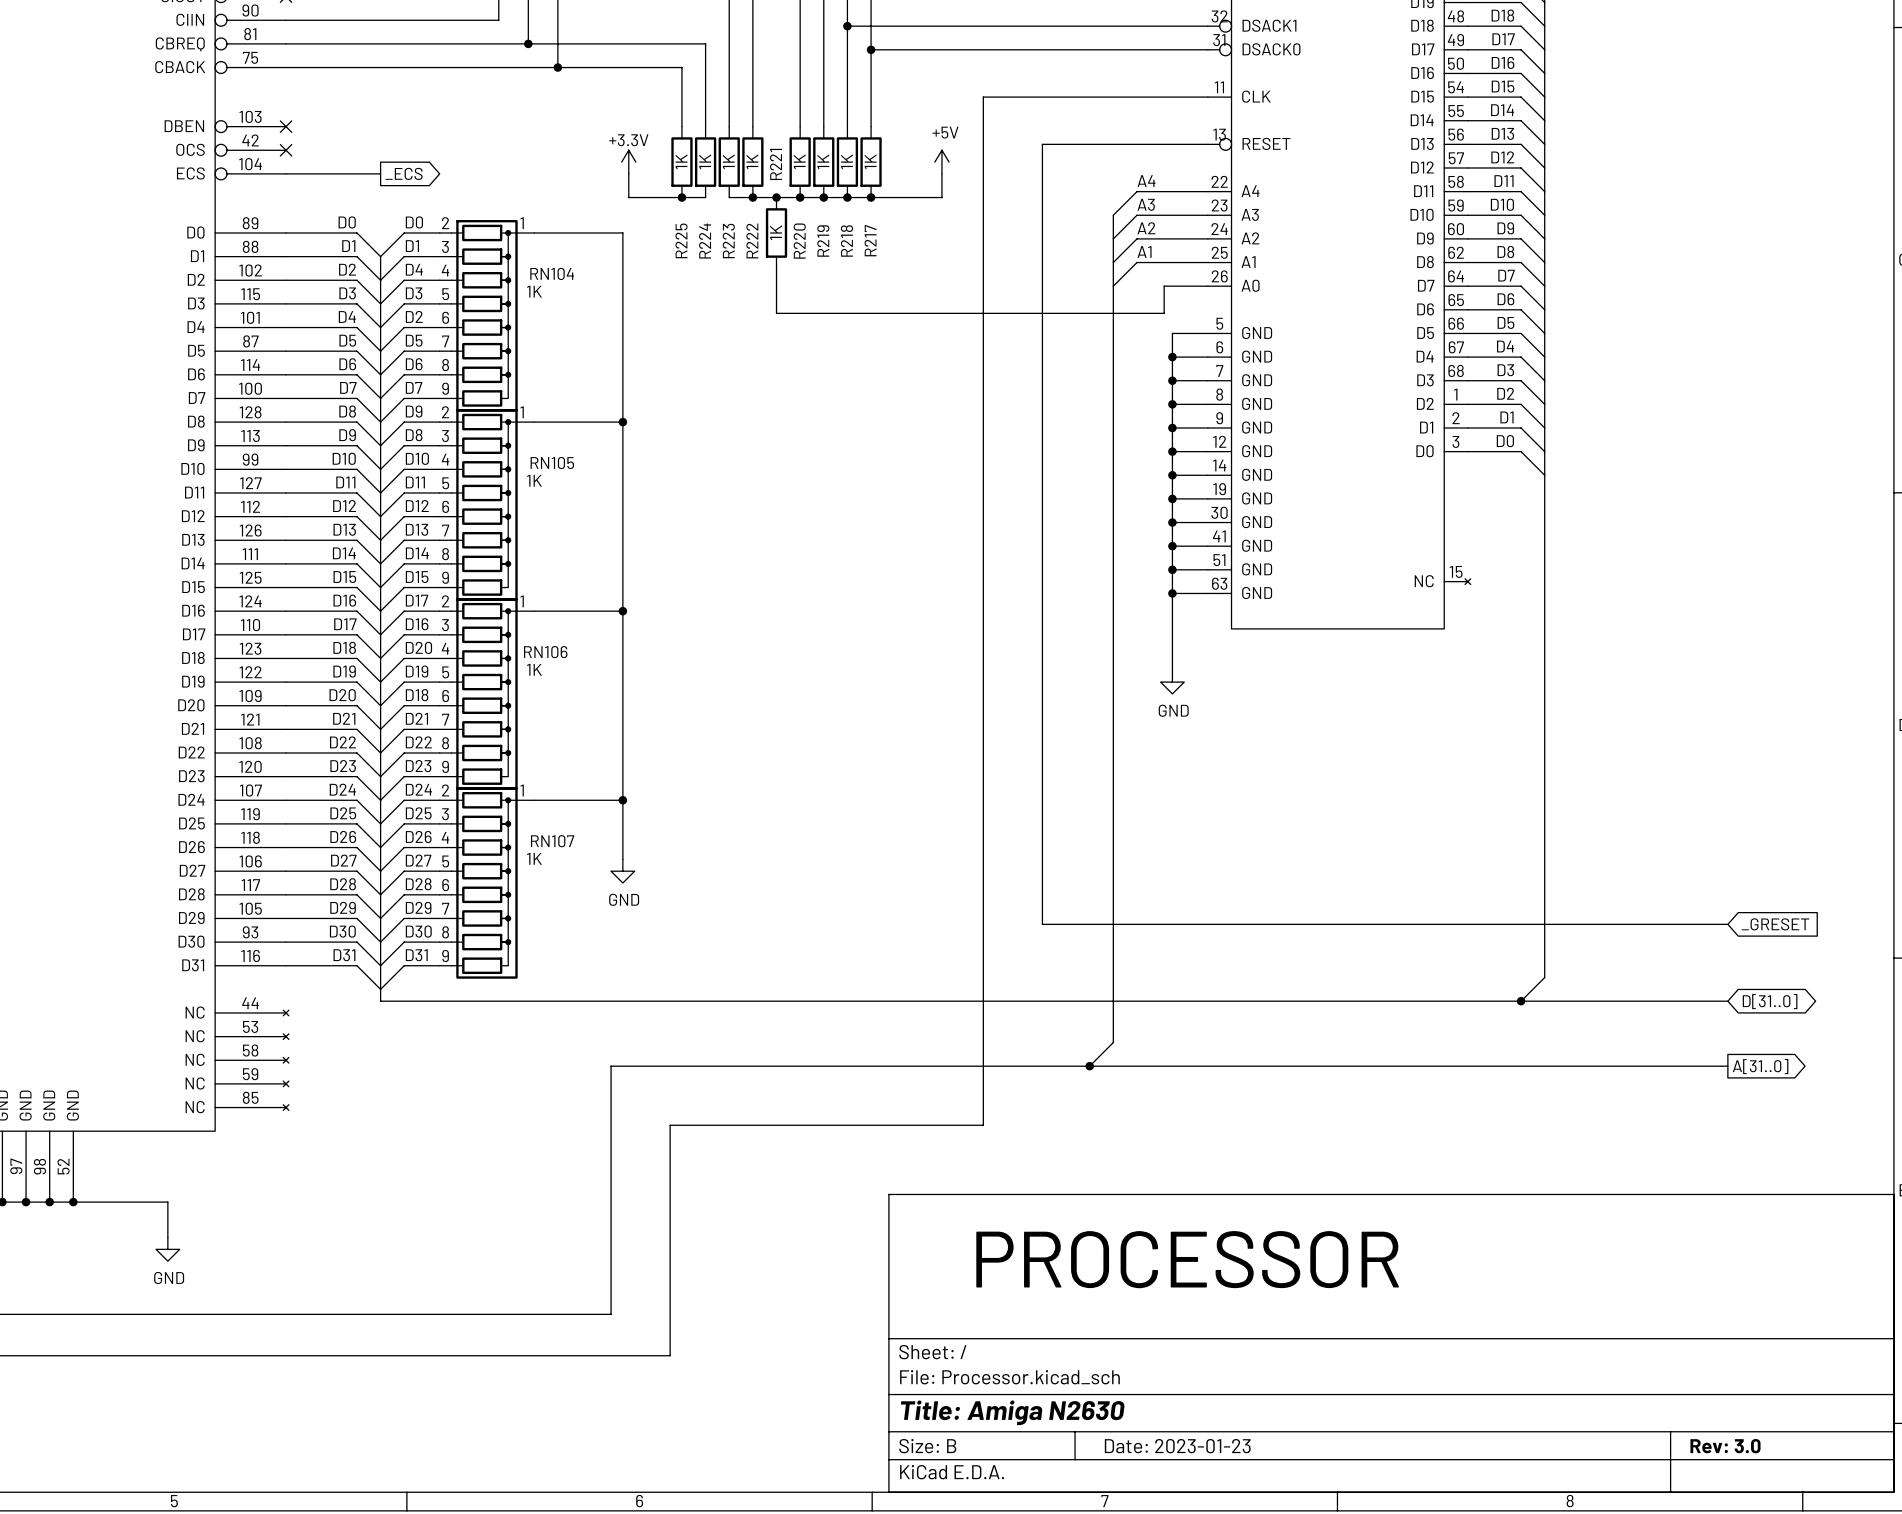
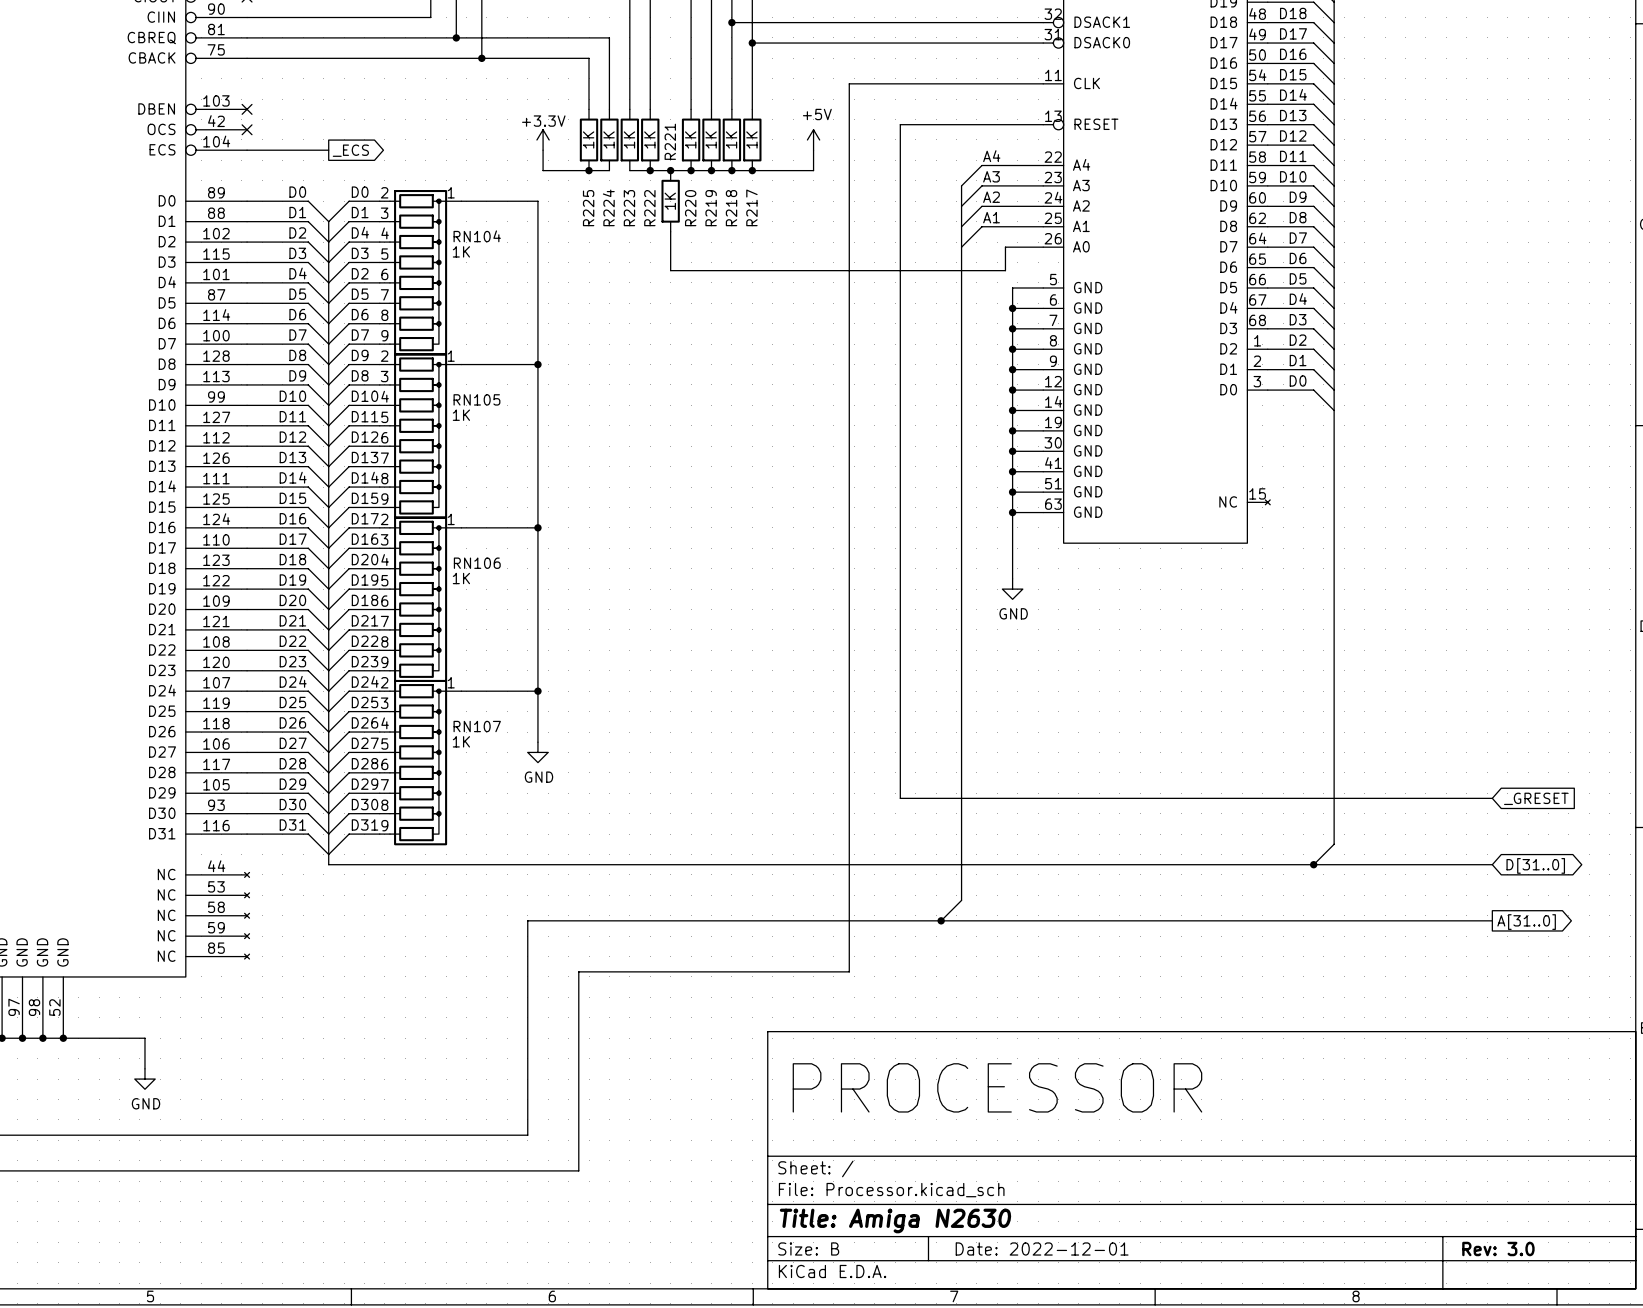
title block: Date: 2023-01-23 (1177, 1446) -> Date: 2022-12-01 (1042, 1248)

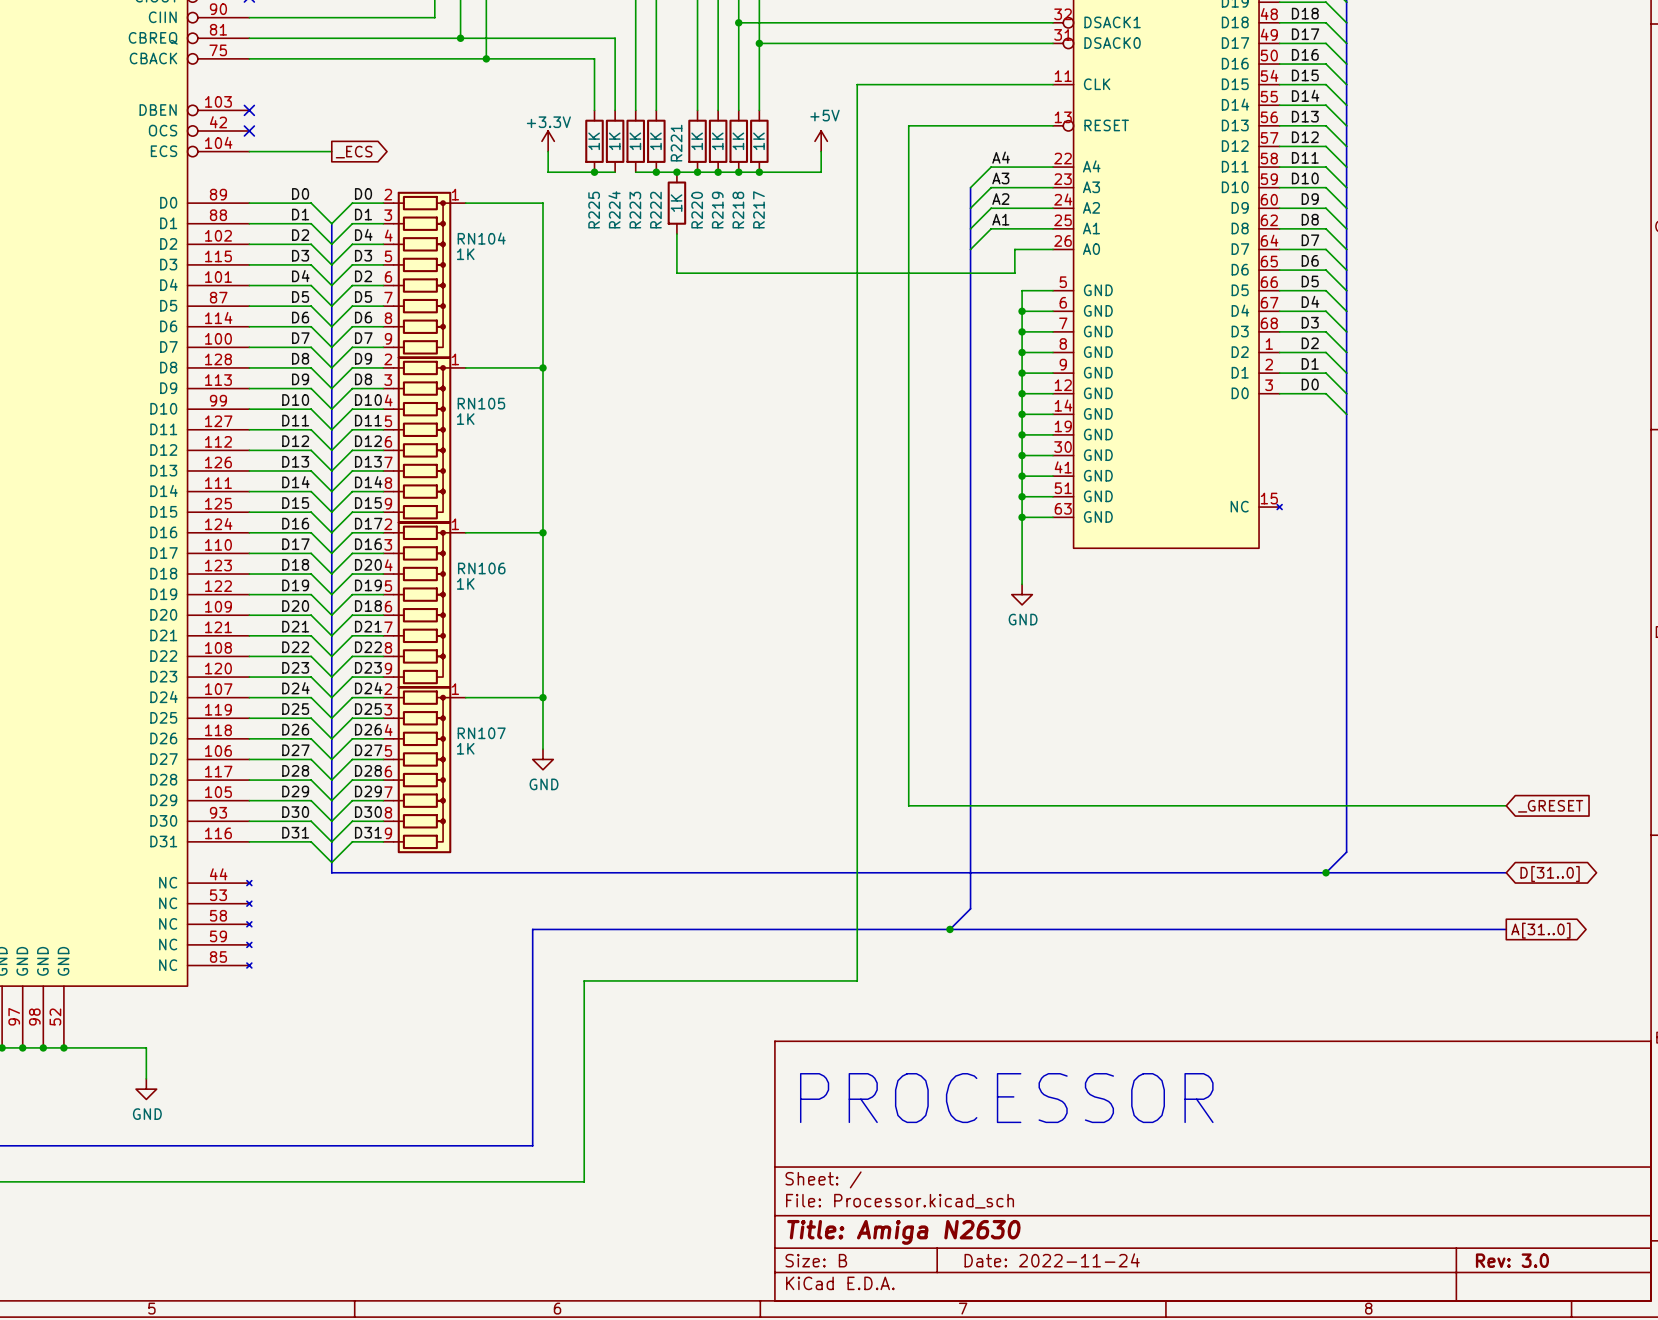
title block: Date: 2022-12-01 (1042, 1248) -> Date: 2022-11-24 (1052, 1260)

